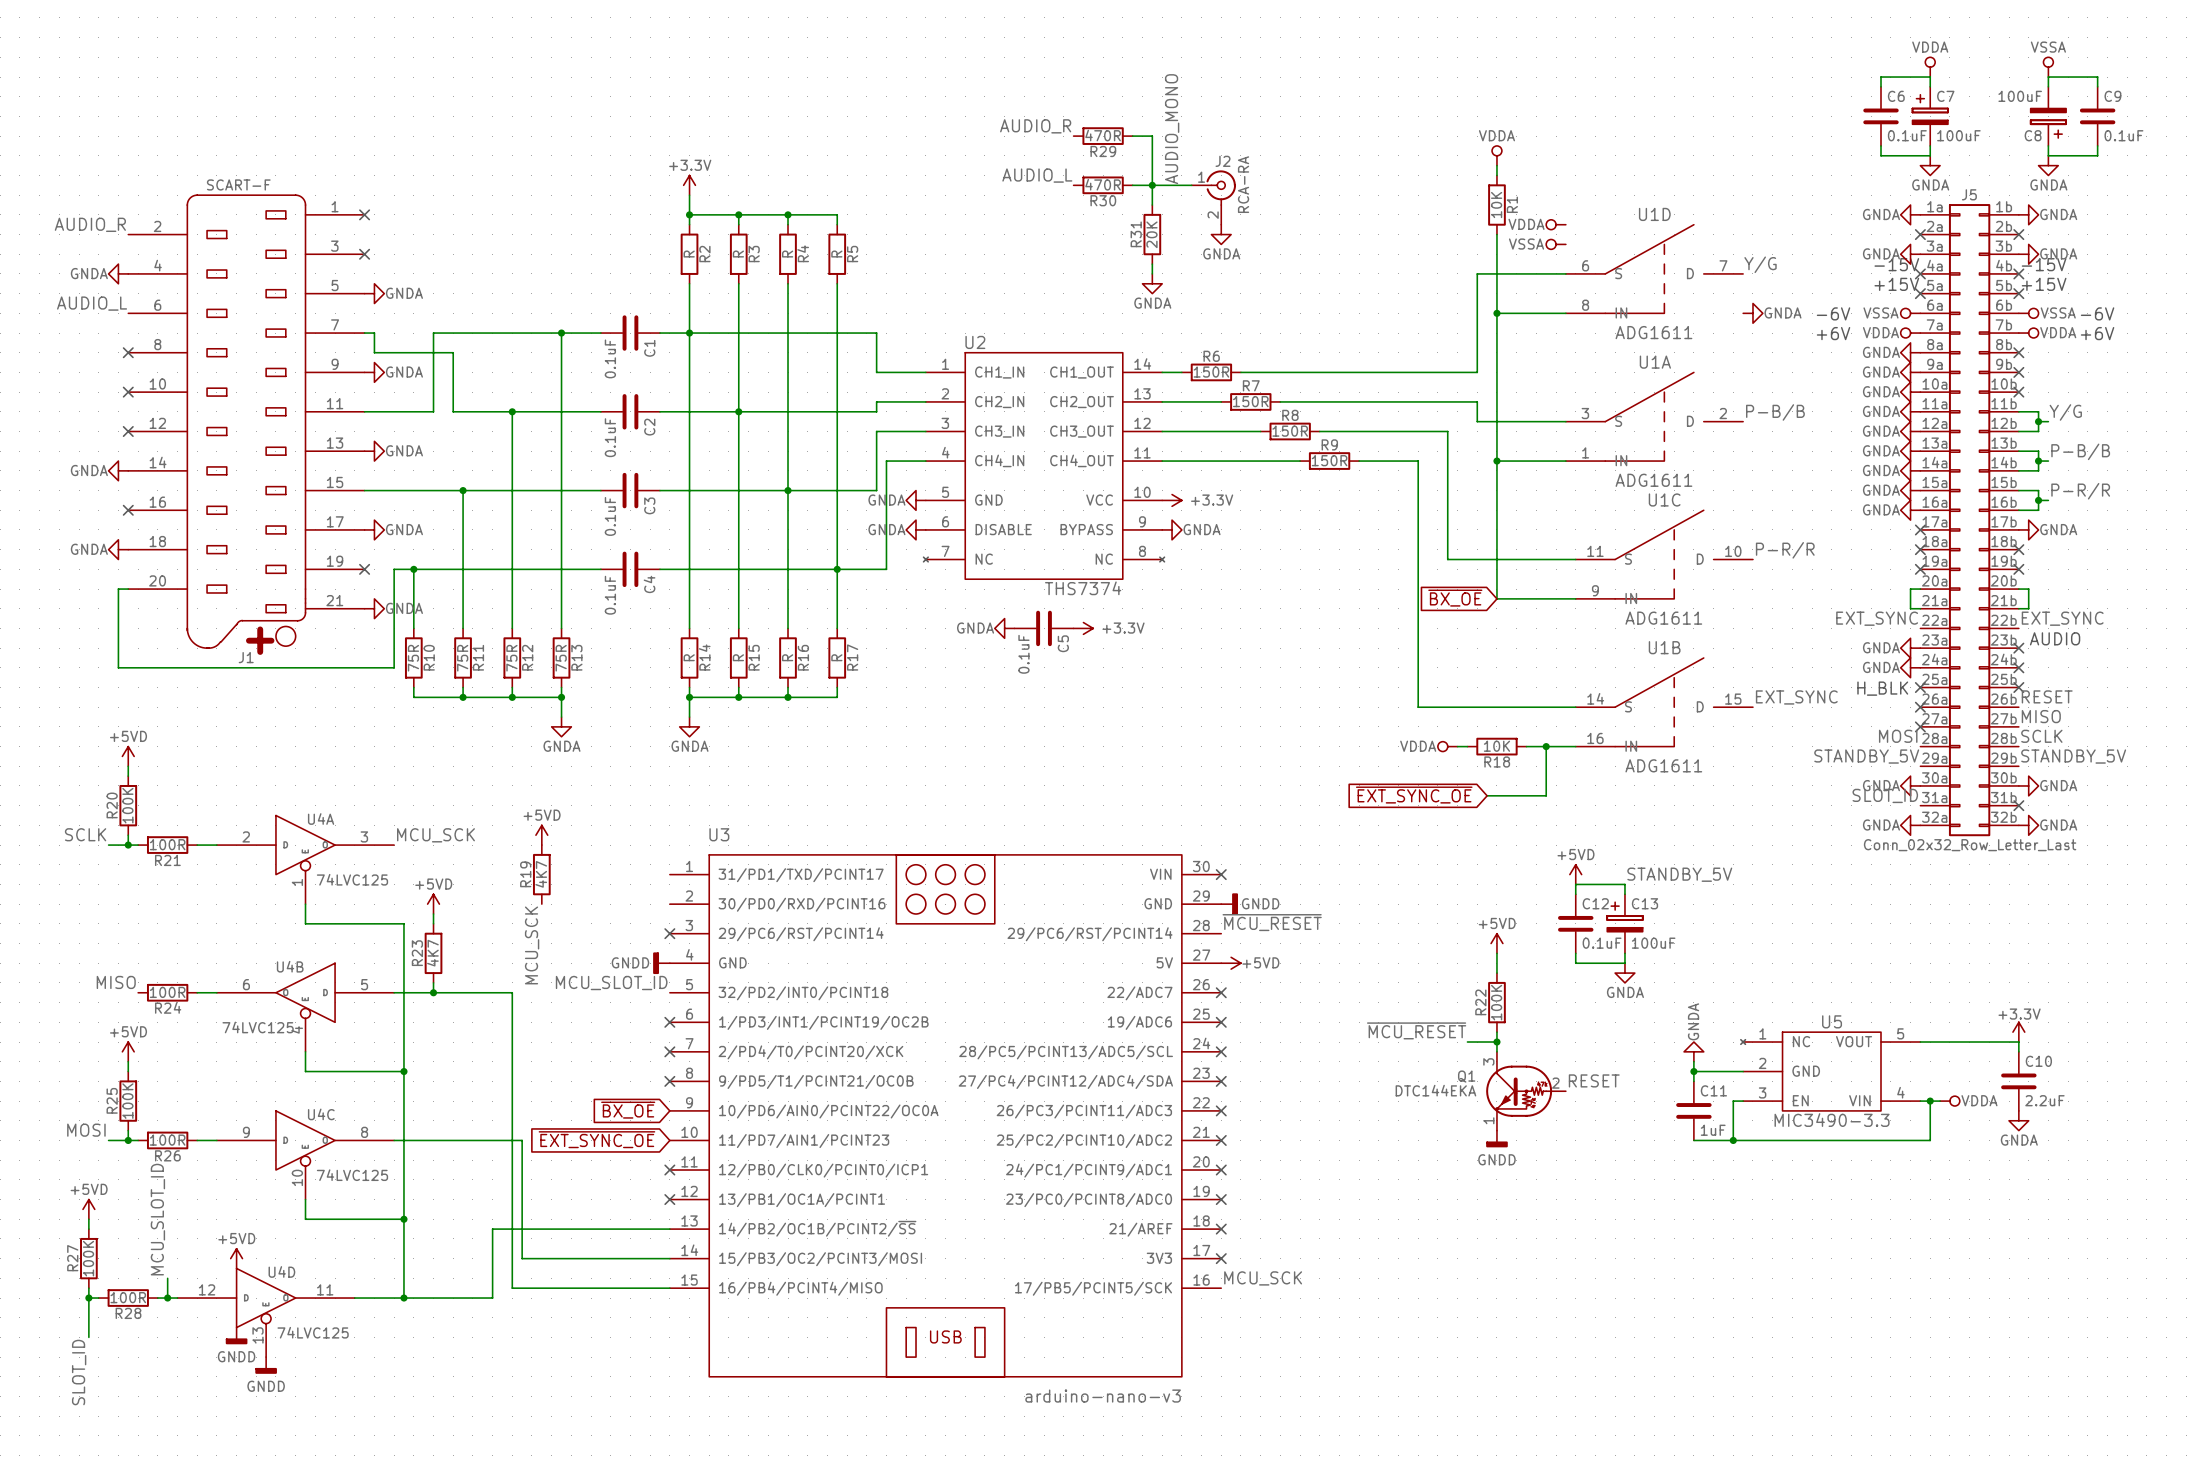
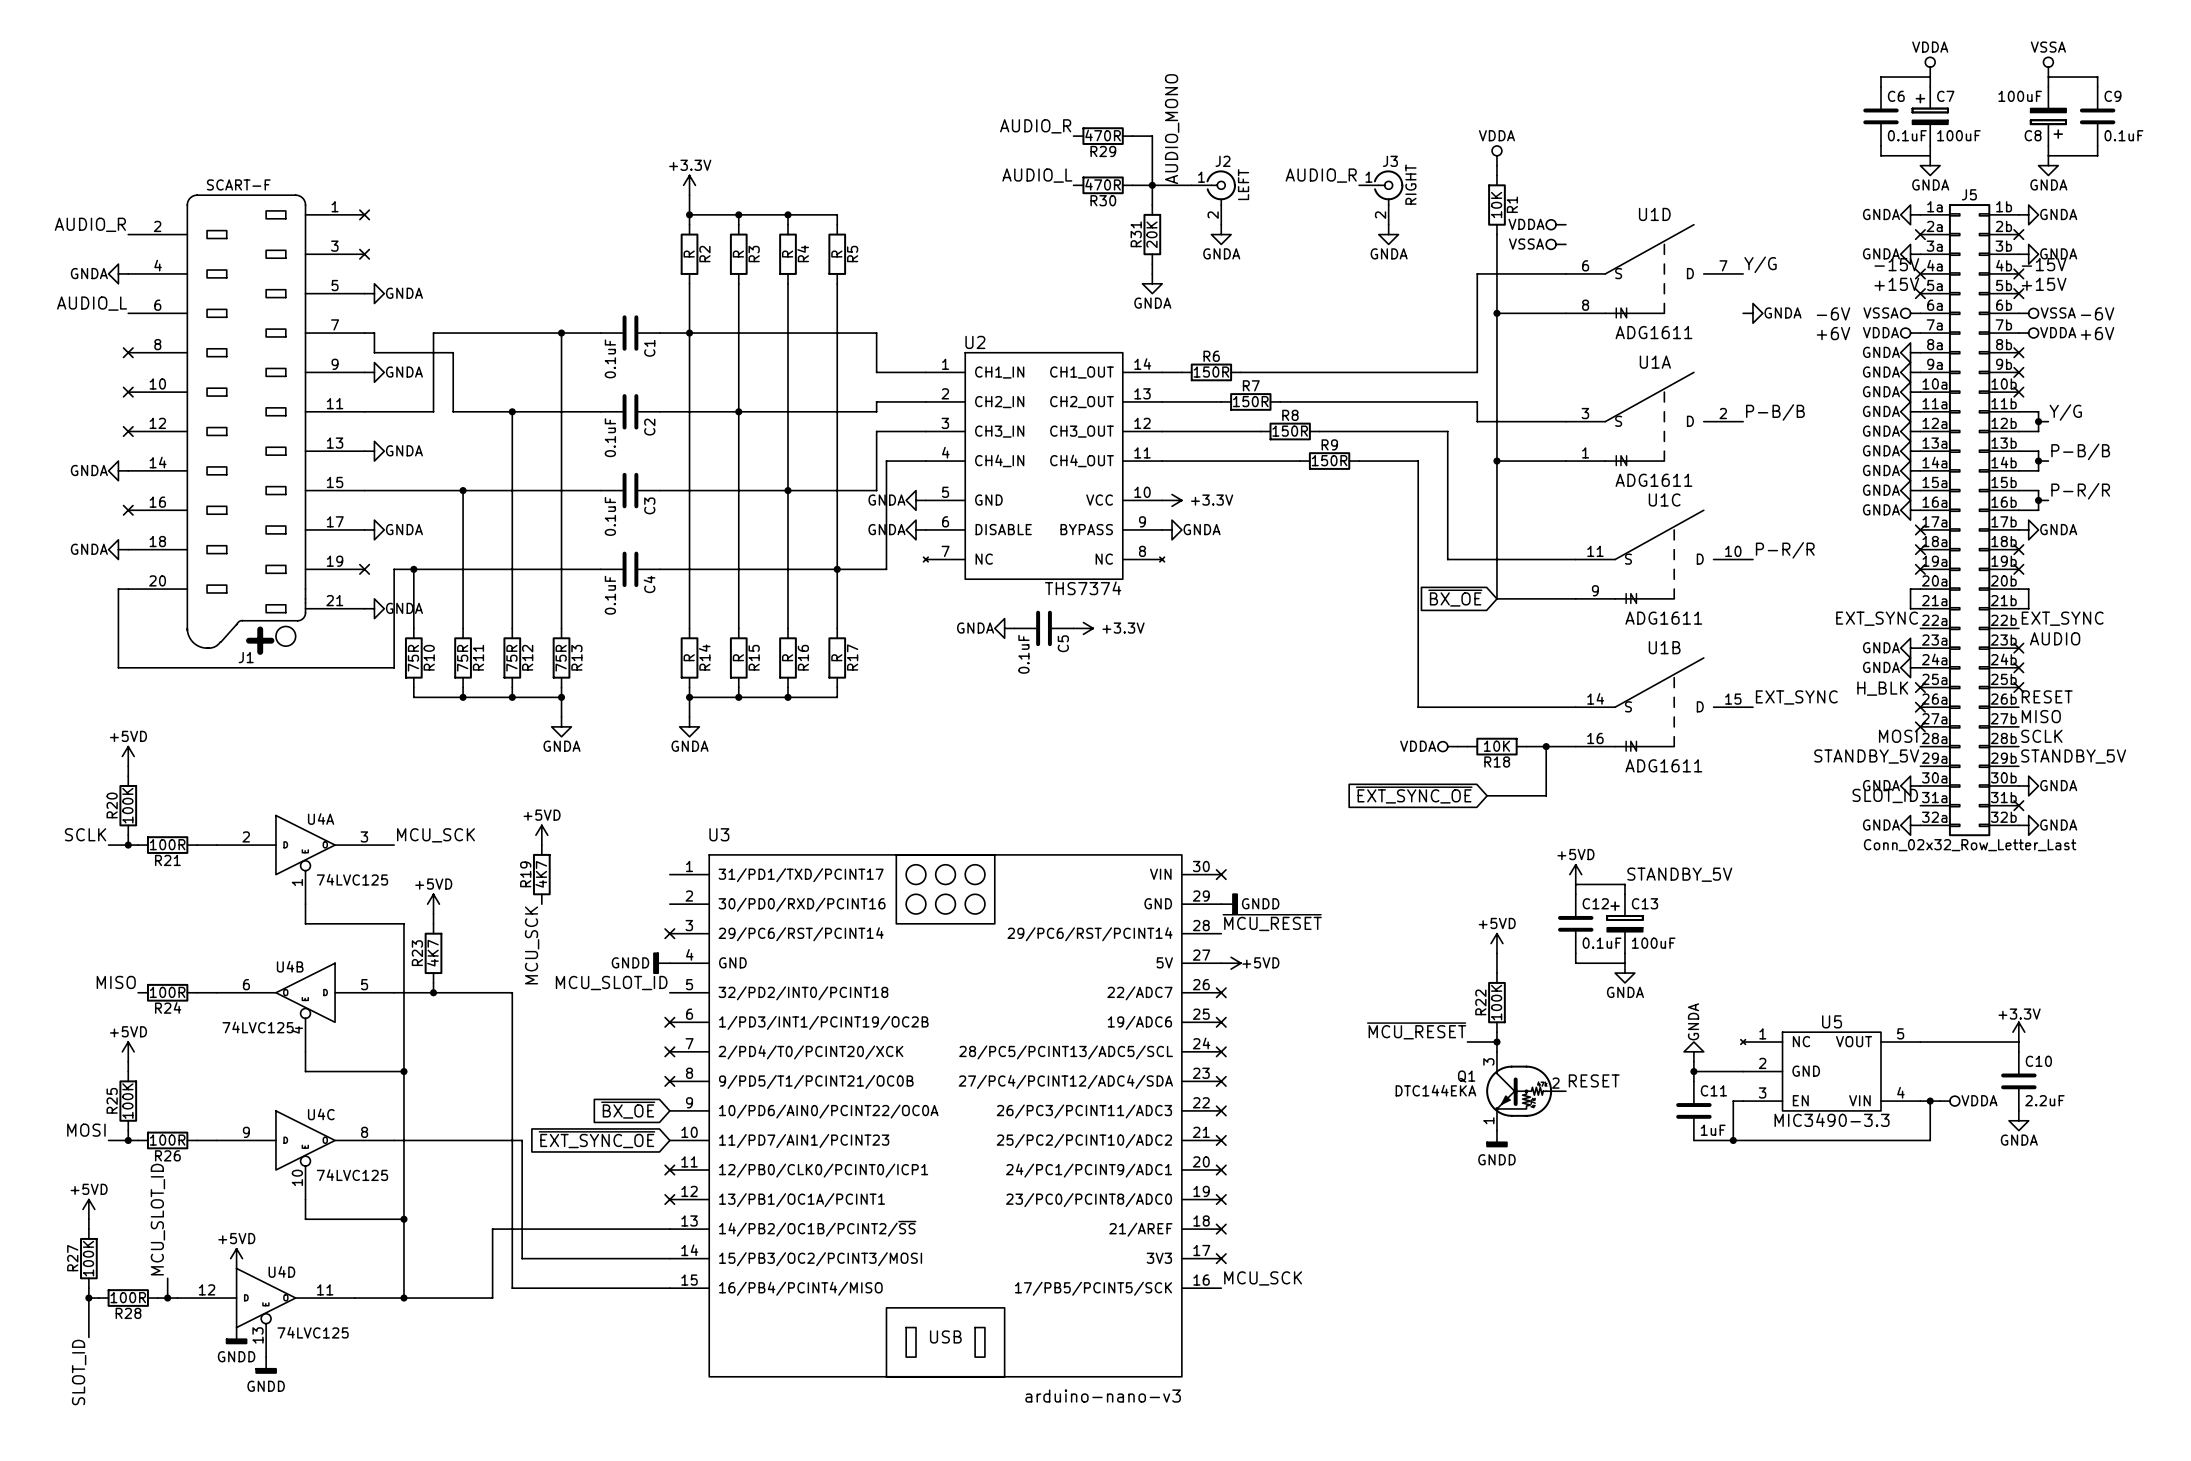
label: none -> AUDIO_R (1321, 175)
J2 value: RCA-RA (1243, 184) -> LEFT (1243, 184)
J3: none -> RIGHT (1381, 197)
power symbol: none -> GNDA (1388, 234)

